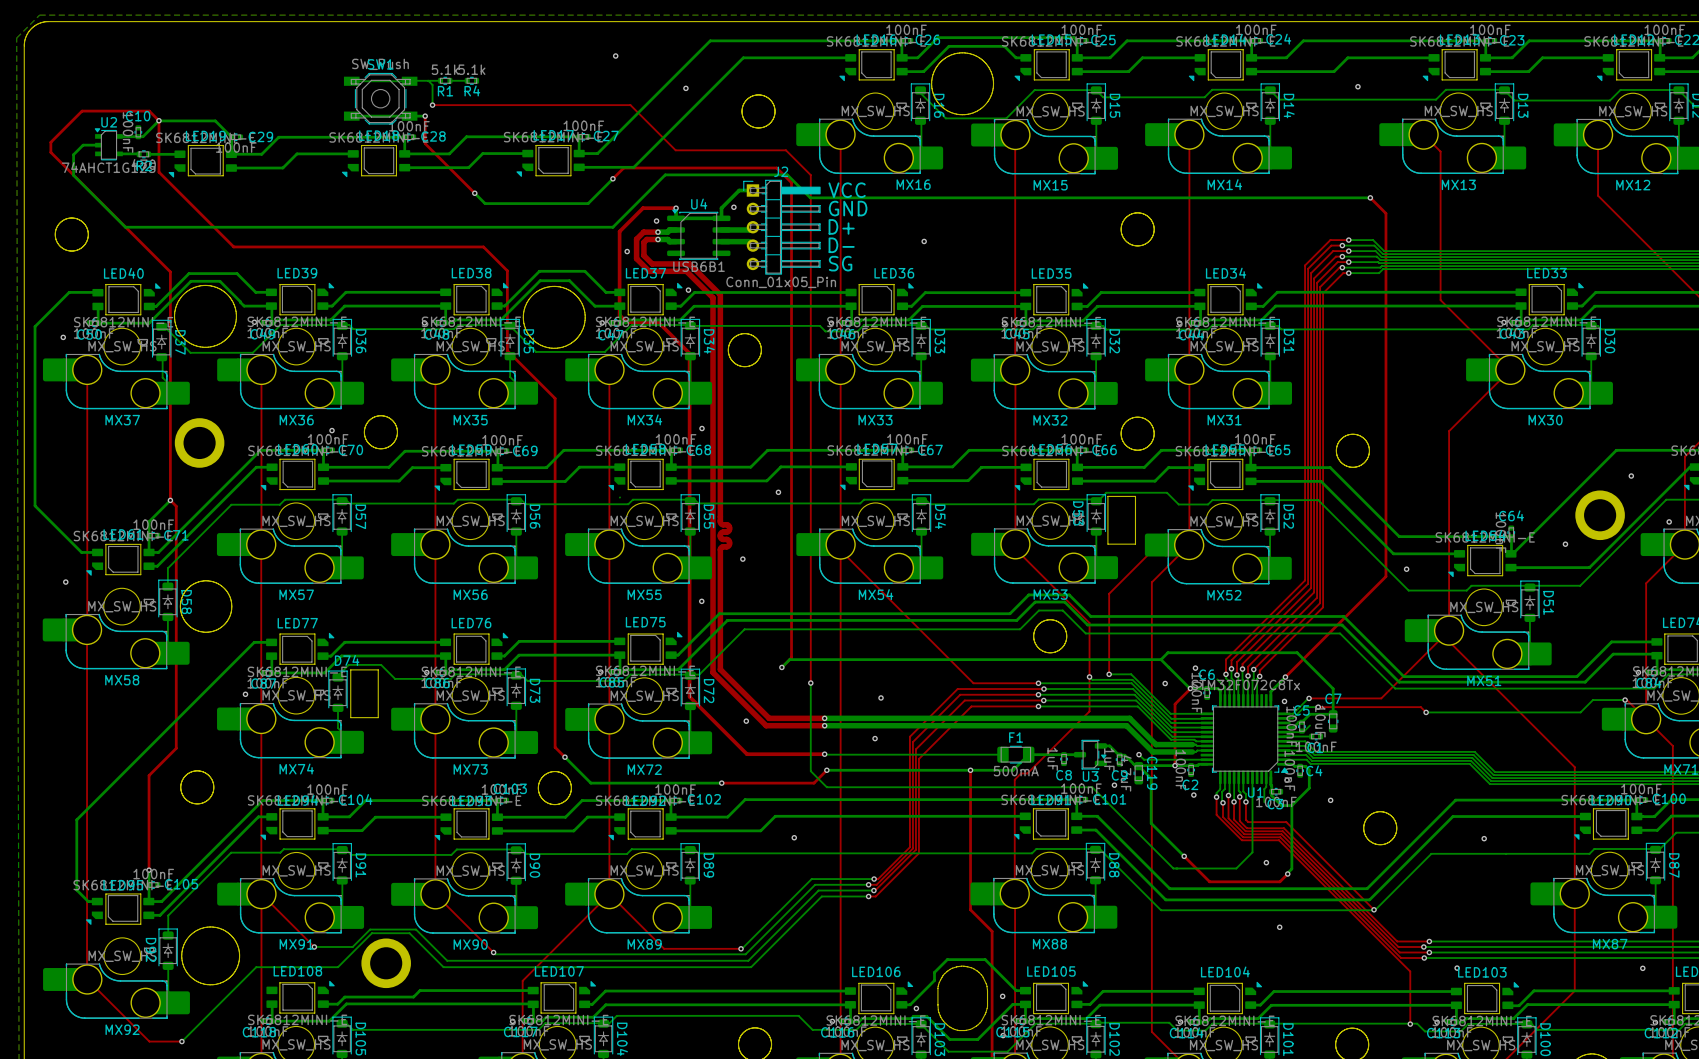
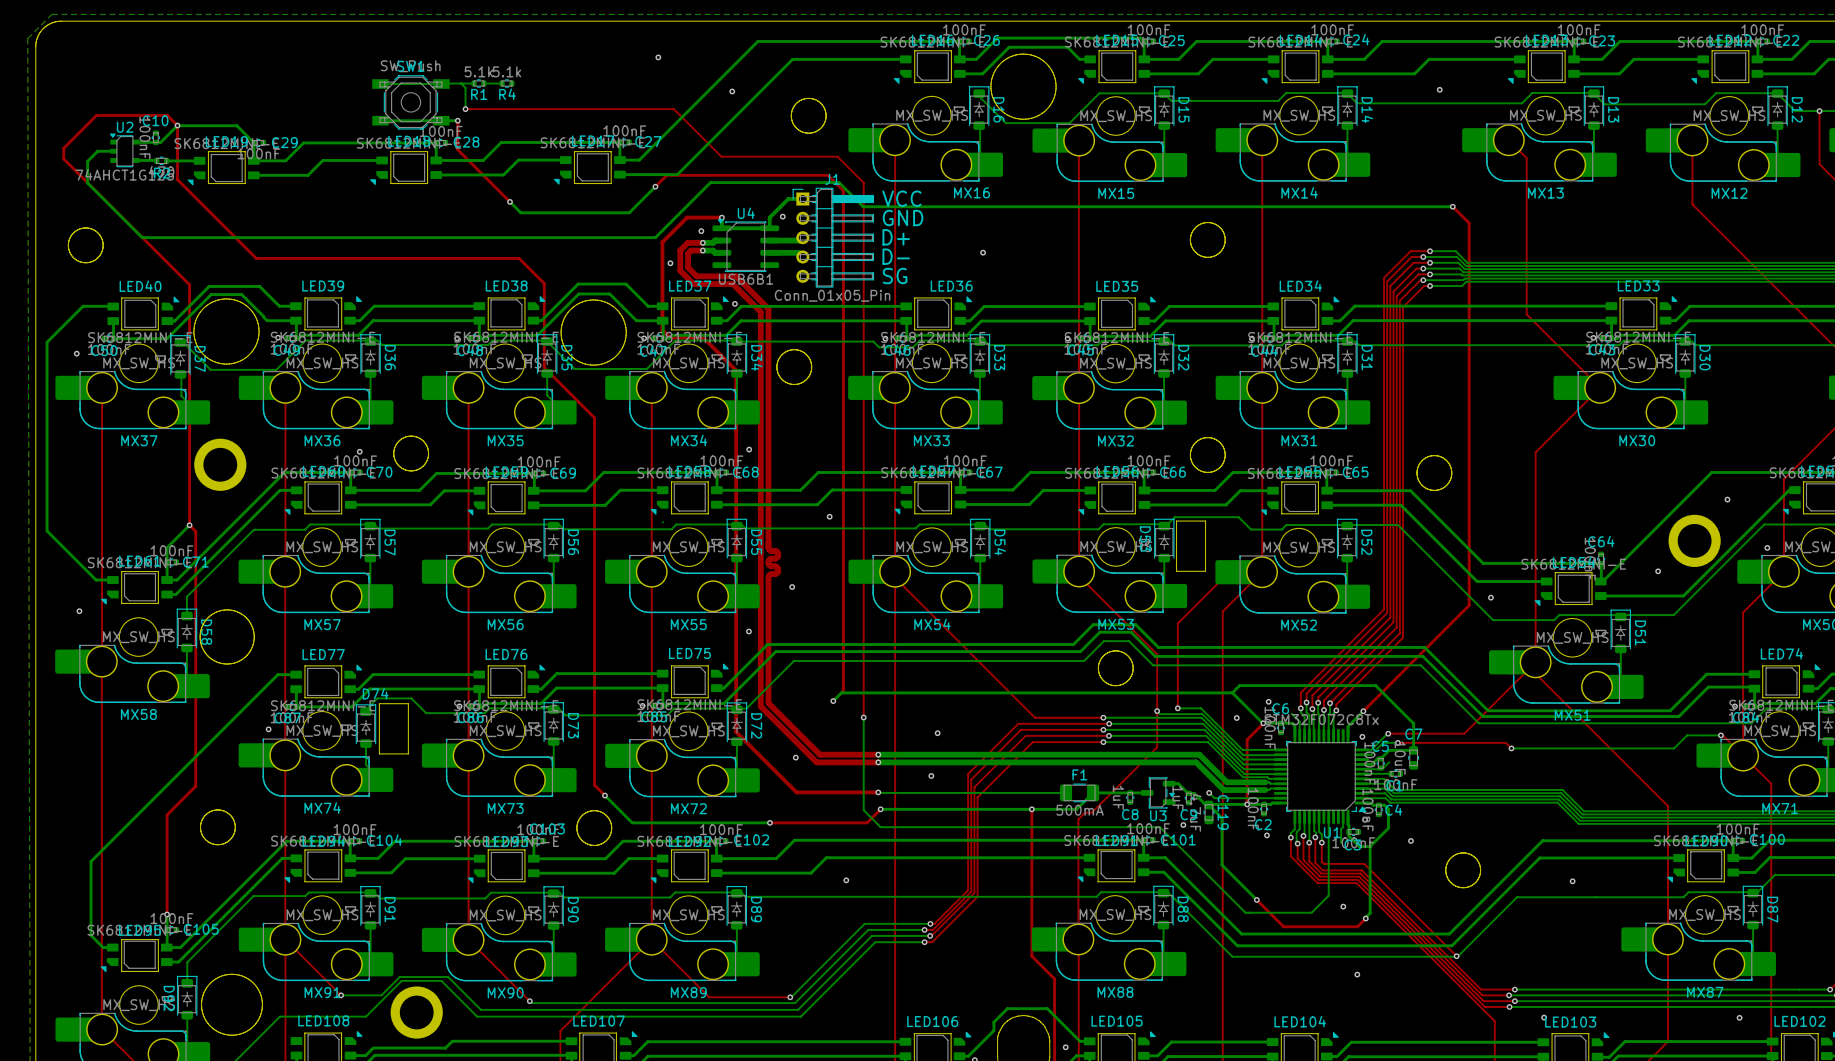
J2 name: J2 (781, 171) -> J1 (832, 179)

